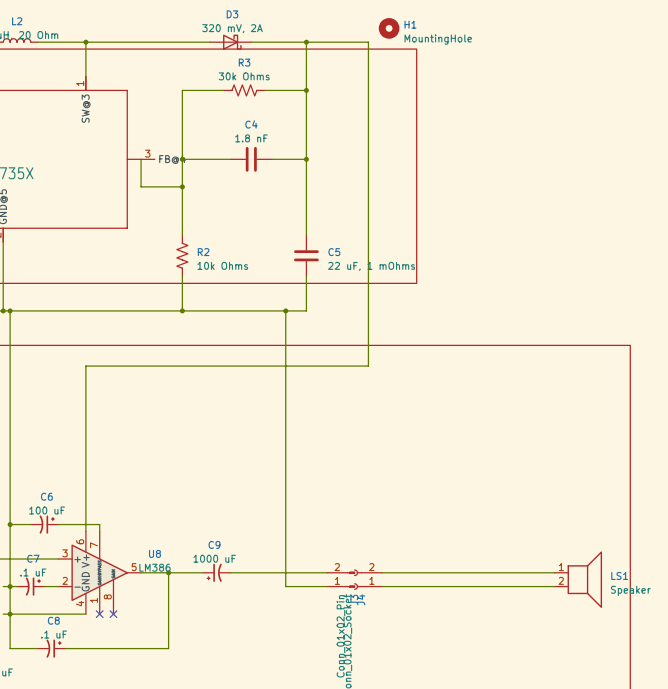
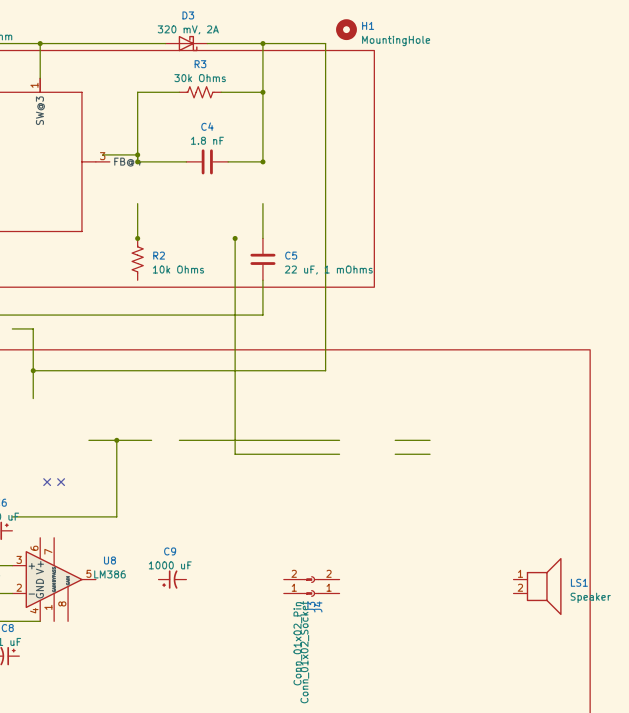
wire: none -> (102, 154) (137, 154)
junction: none -> (137, 154)
wire: (141, 159) (141, 186) (182, 186) -> none
wire: (182, 159) (182, 200) -> none
wire: (306, 159) (306, 200) -> none
junction: (182, 186) -> none
junction: none -> (137, 238)
wire: none -> (235, 238) (235, 454) (339, 454)
junction: none -> (235, 238)
wire: (182, 276) (182, 310) -> none
junction: (182, 310) -> none
wire: (285, 310) (285, 586) (327, 586) -> none
junction: (285, 310) -> none
wire: none -> (12, 328) (33, 328) (33, 398)
junction: none -> (33, 370)
wire: (85, 366) (85, 531) -> (40, 370) (33, 370)
wire: none -> (88, 440) (151, 440)
wire: none -> (116, 440) (116, 516) (12, 516)
junction: none -> (116, 440)
wire: none -> (179, 440) (339, 440)
wire: none -> (395, 440) (430, 440)
wire: none -> (395, 454) (430, 454)
no-connect mark: none -> (47, 482)
no-connect mark: none -> (61, 482)
wire: (58, 524) (99, 524) (99, 531) -> none
wire: (141, 572) (203, 572) -> none
wire: (168, 572) (168, 648) (65, 648) -> none
junction: (168, 572) -> none
wire: (230, 572) (327, 572) -> none
wire: (382, 572) (554, 572) -> none
wire: (382, 586) (554, 586) -> none
no-connect mark: (99, 614) -> none
no-connect mark: (113, 614) -> none

